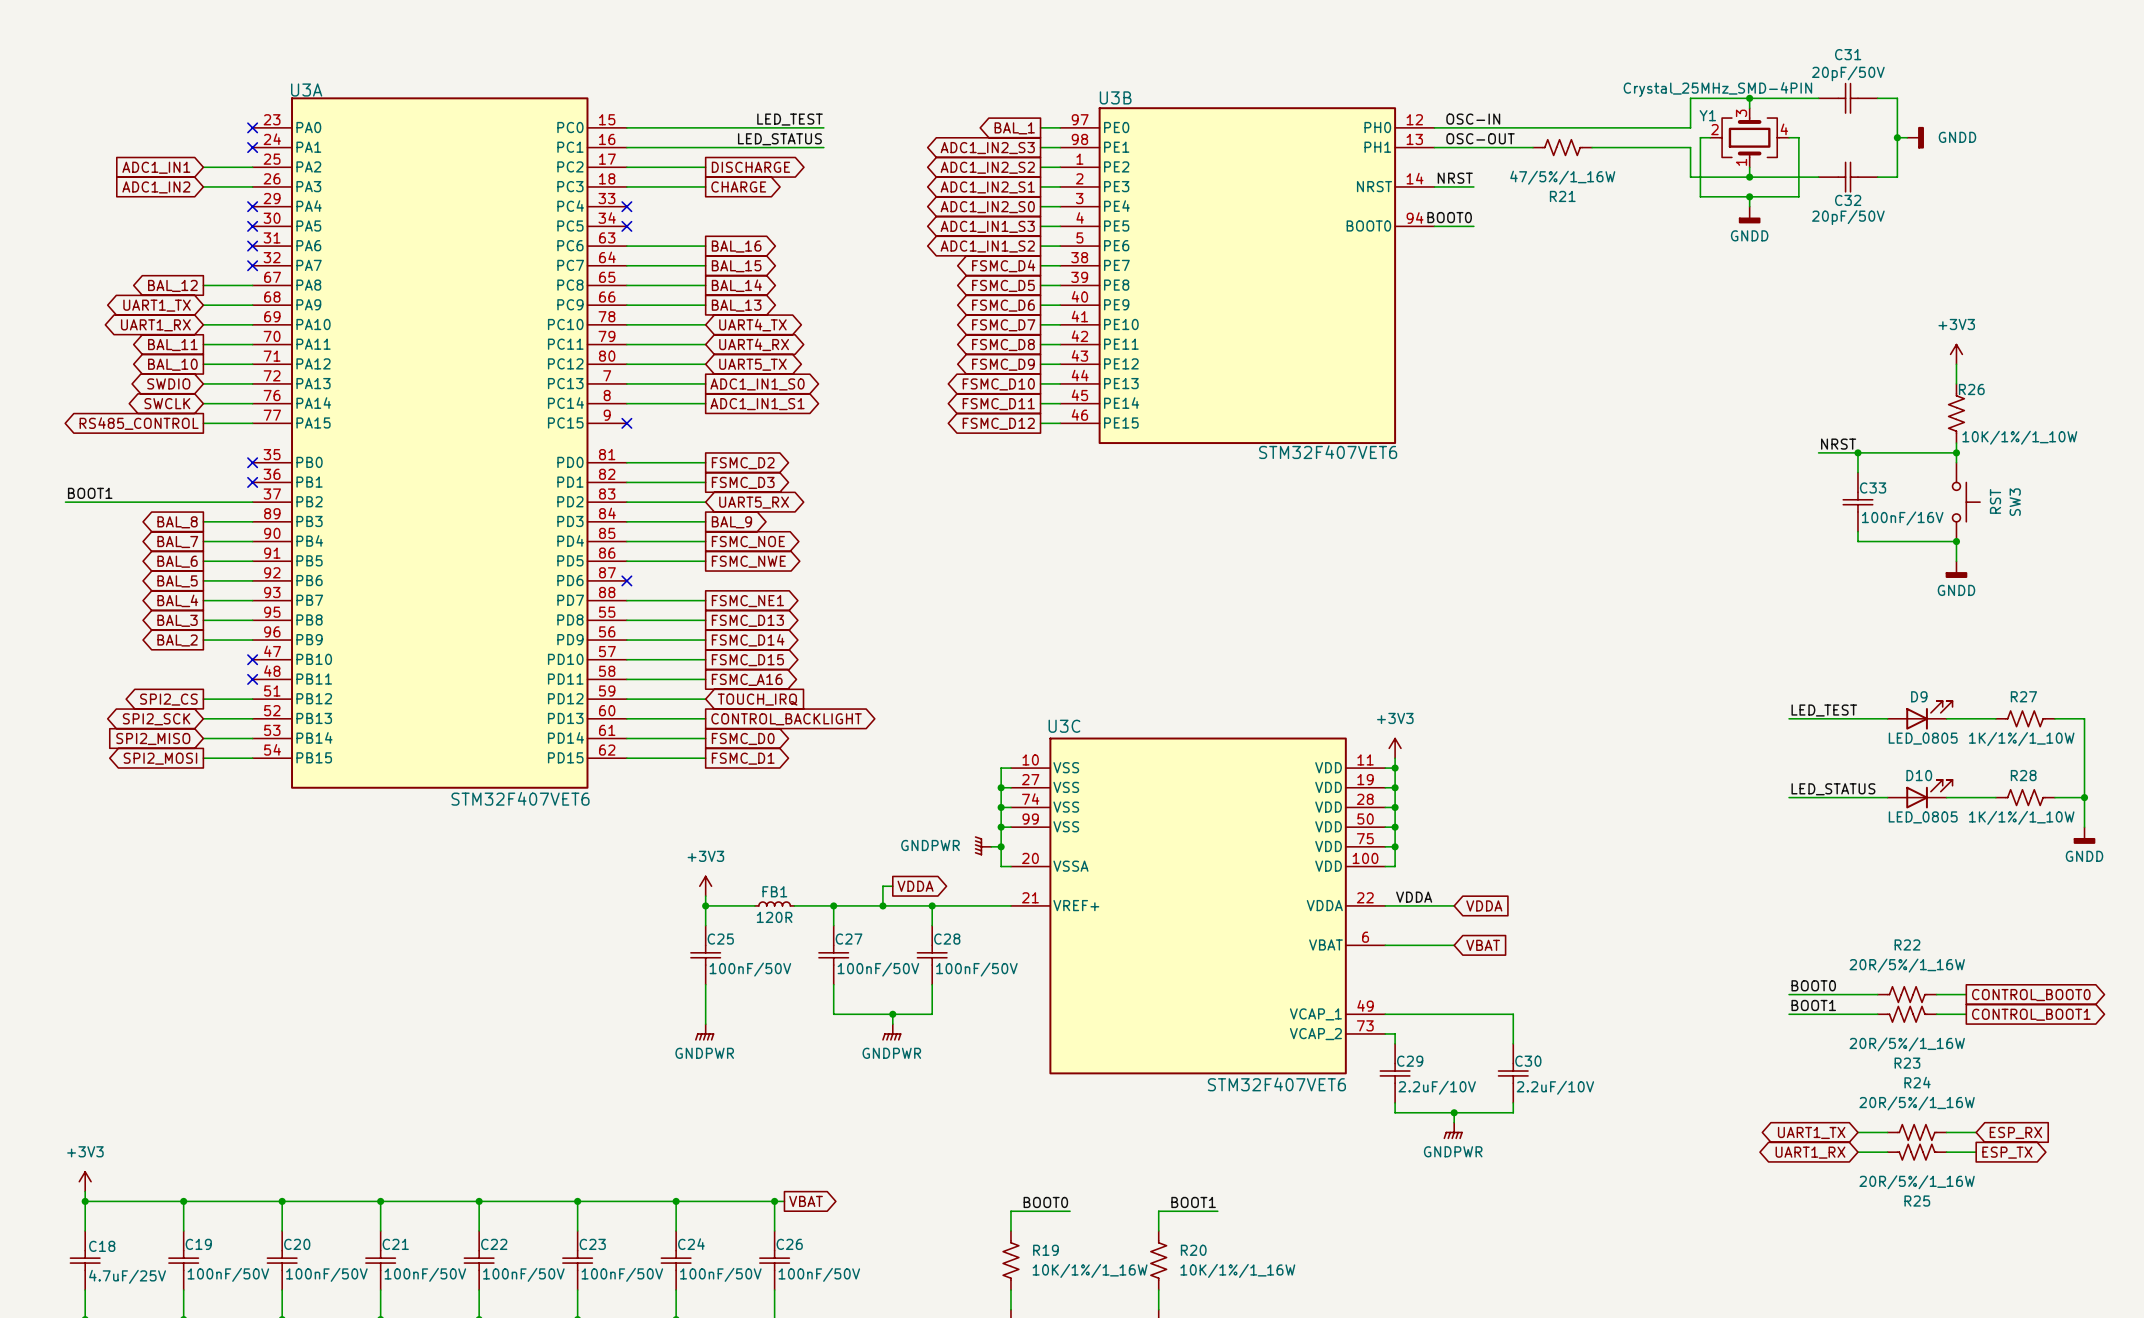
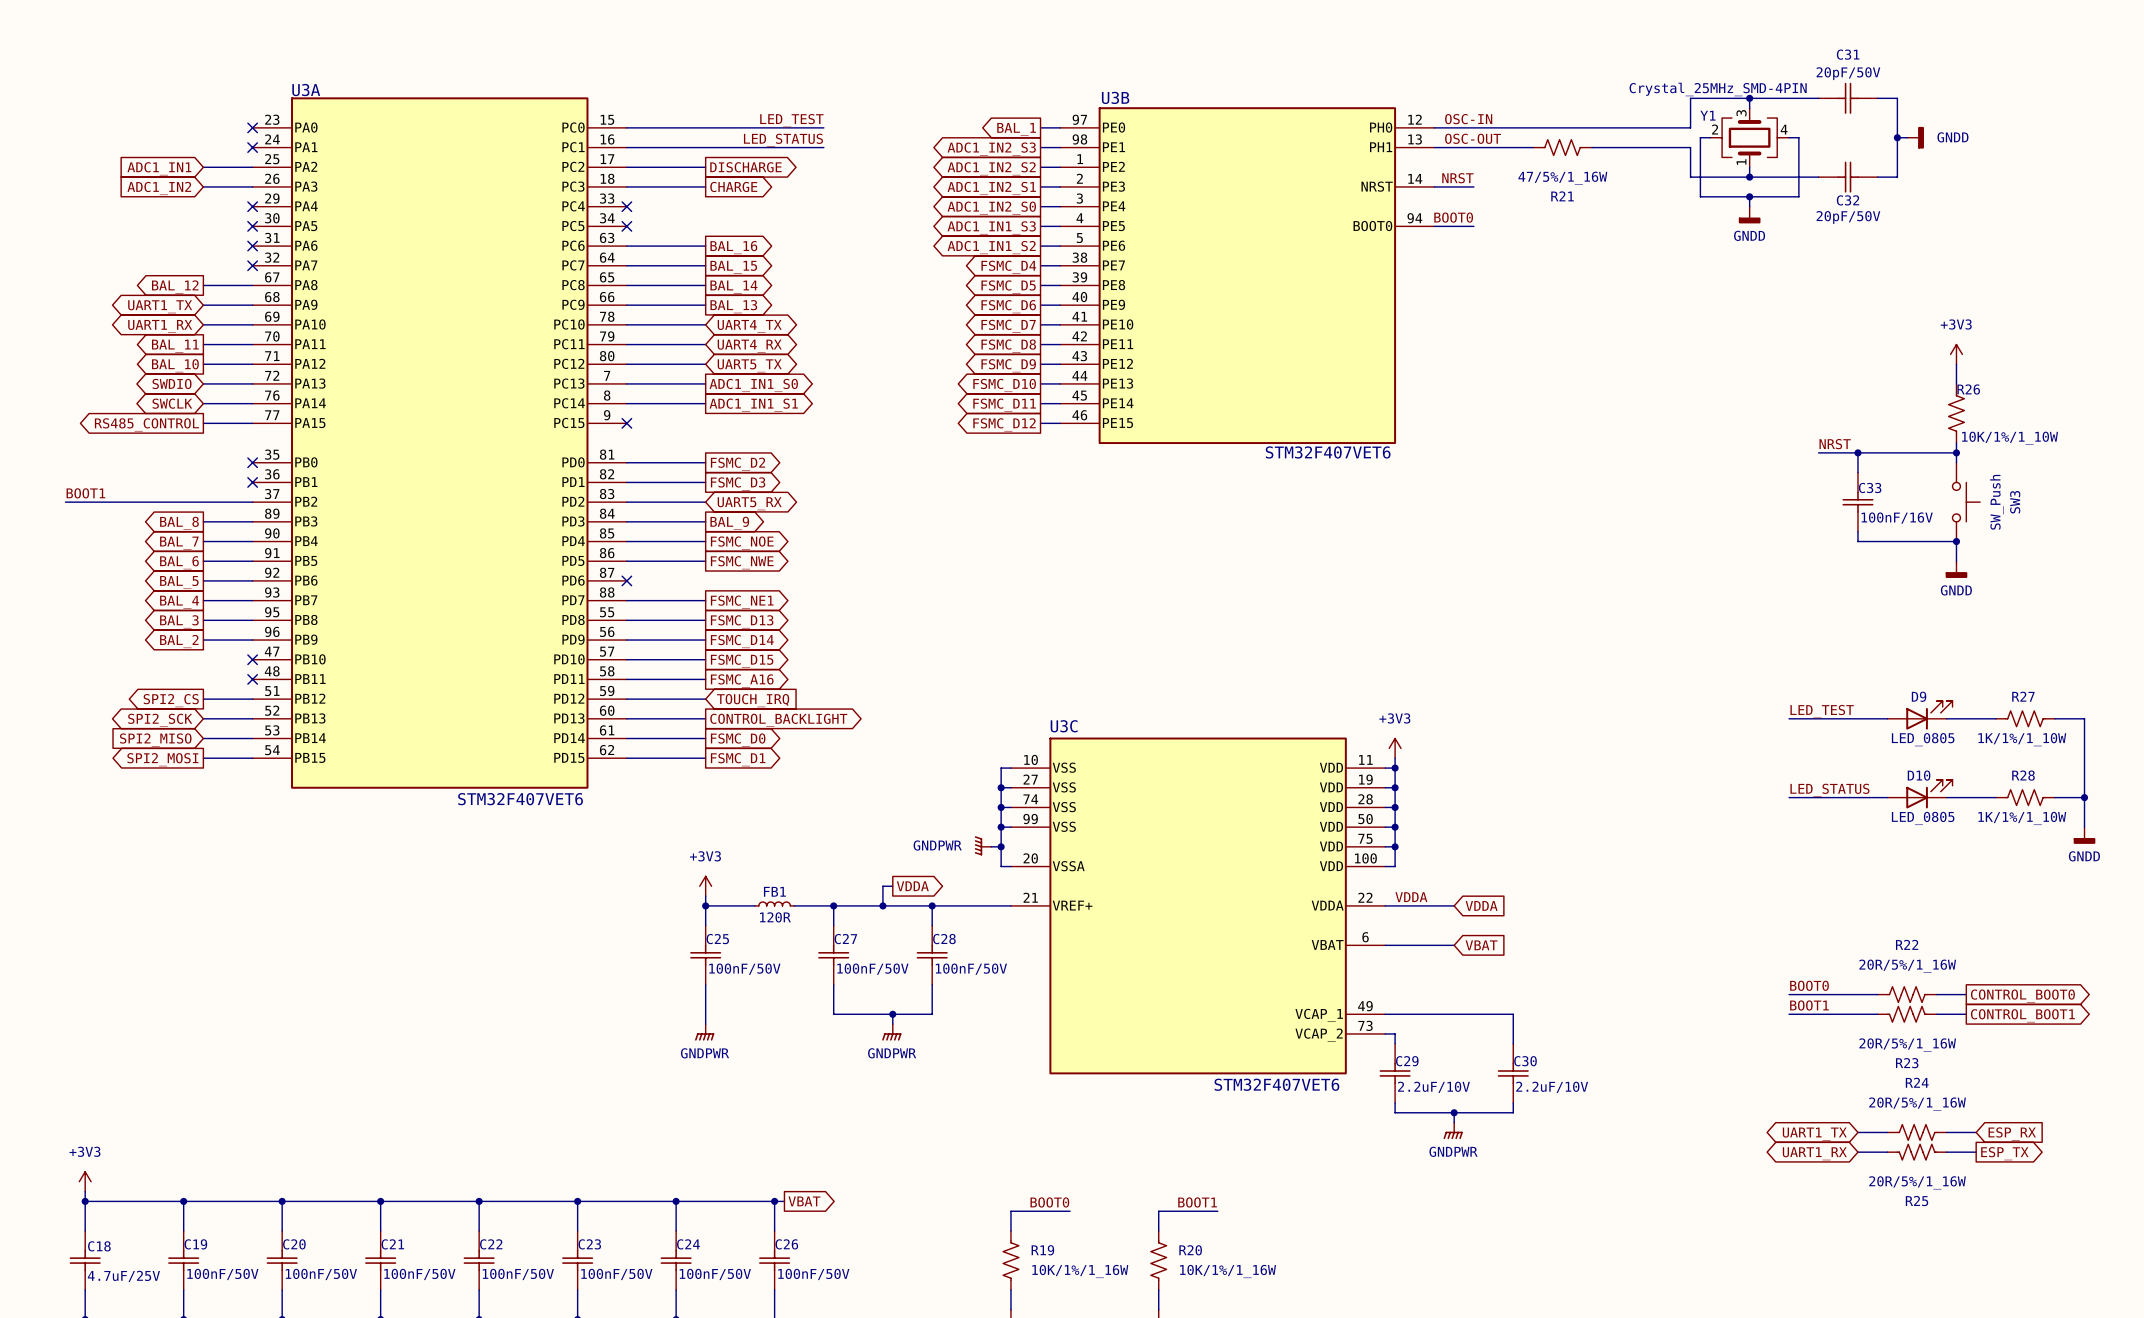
SW3 value: RST (1995, 501) -> SW_Push (1996, 502)

